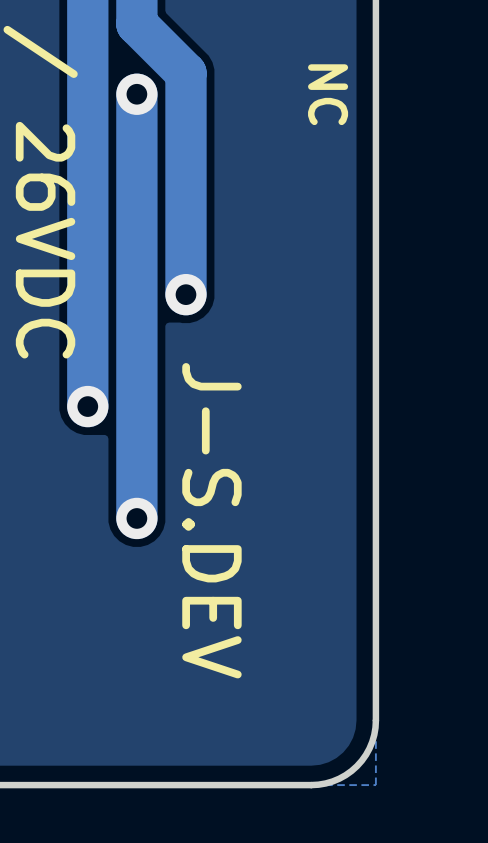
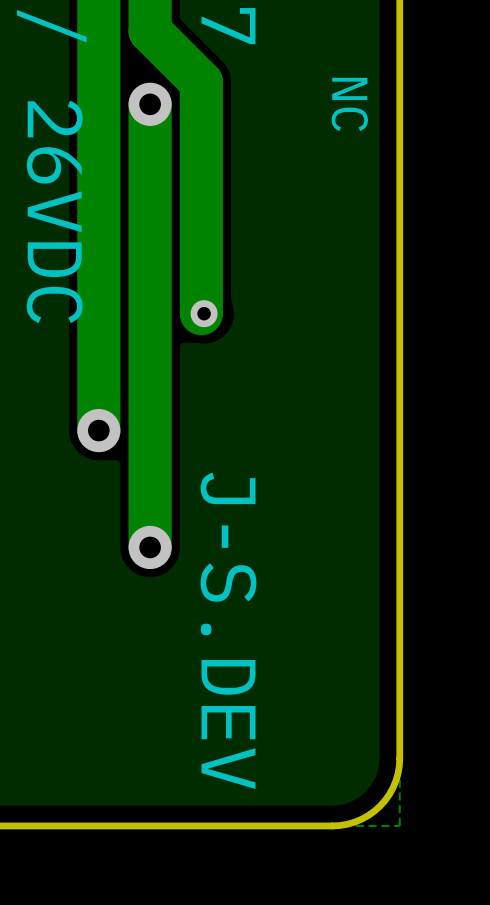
via size: [165, 273, 207, 316] -> [190, 300, 218, 328]

